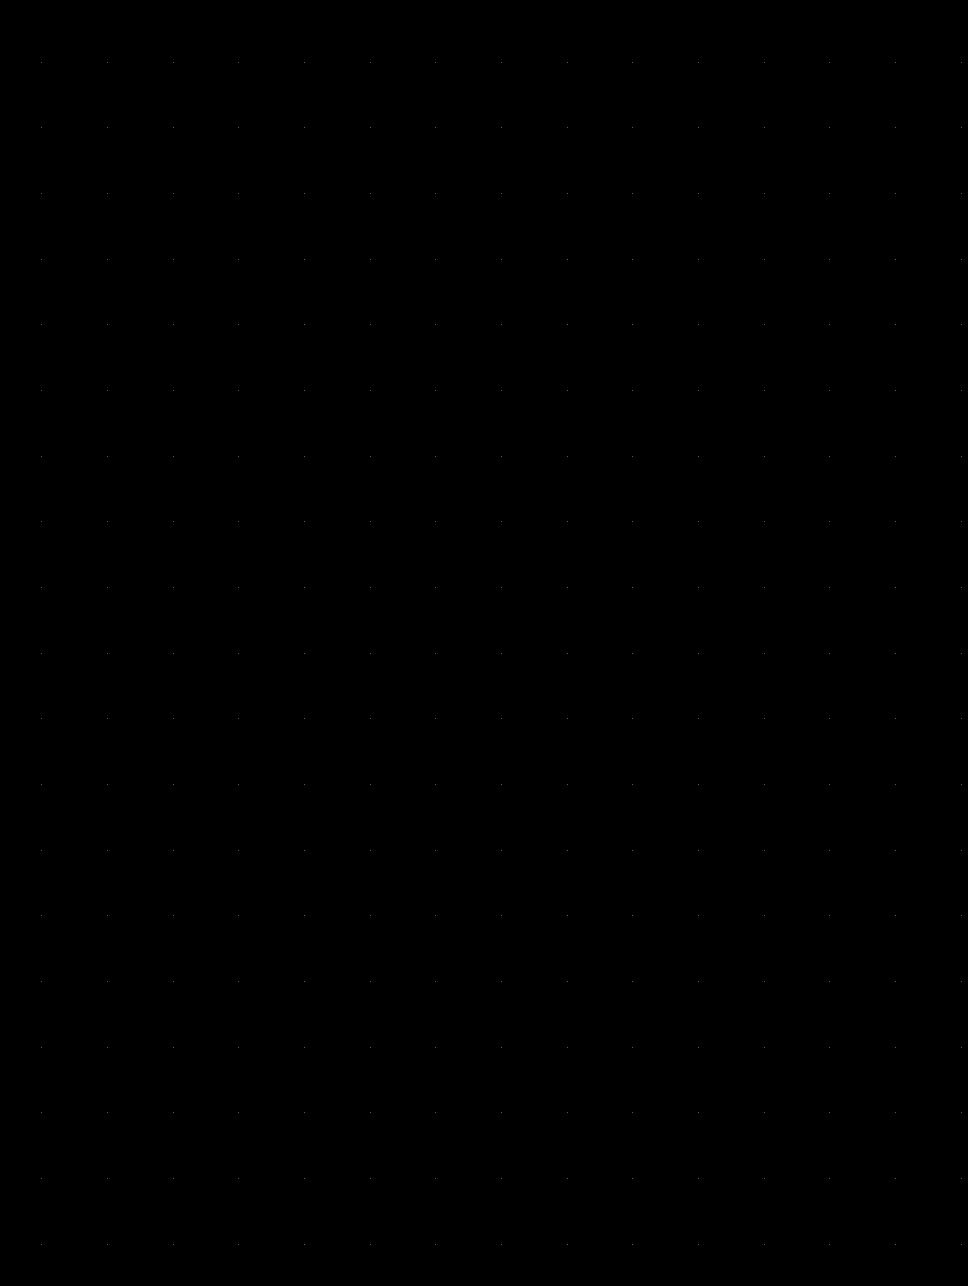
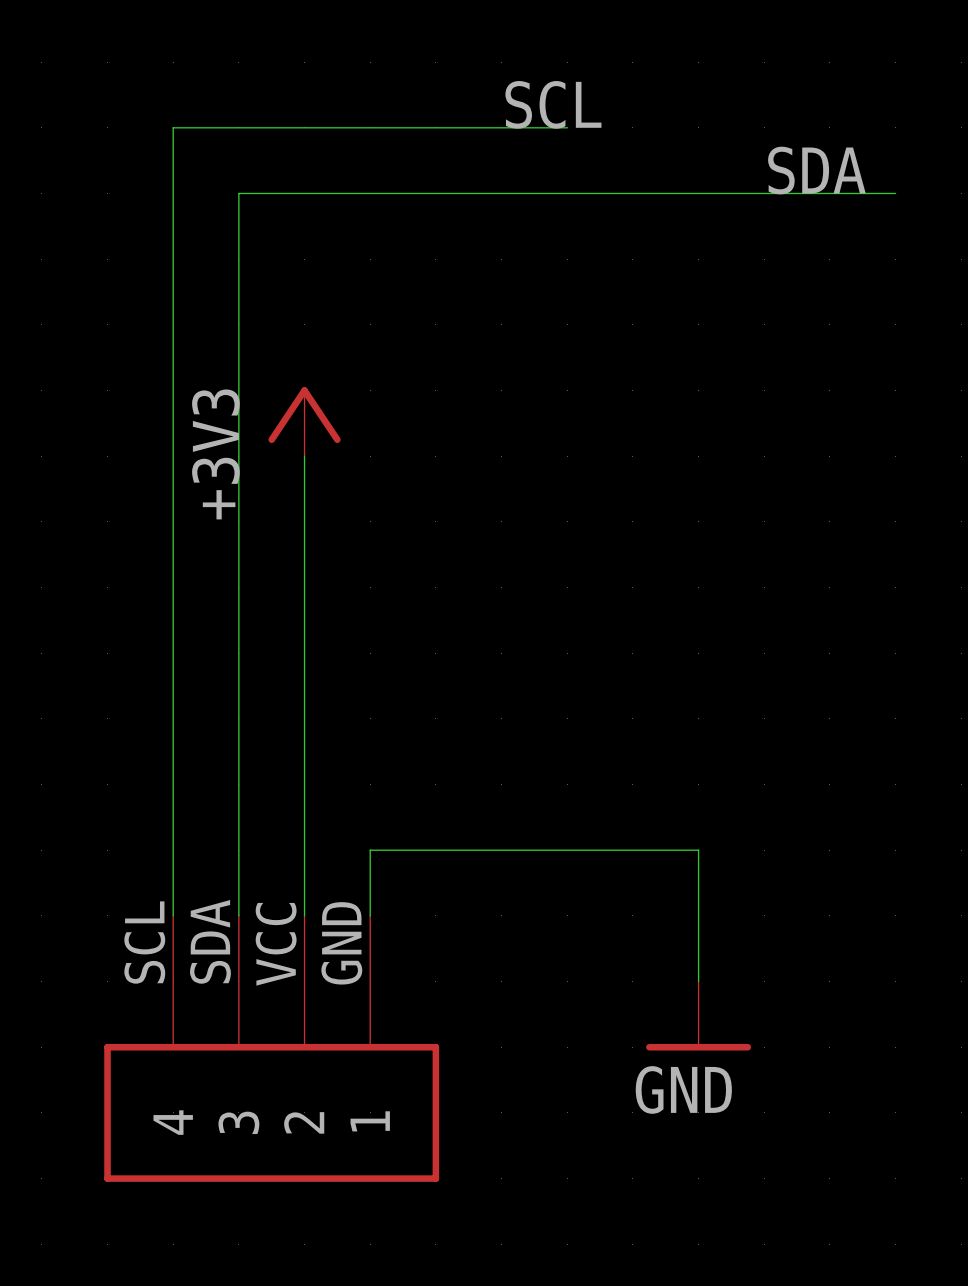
label: none -> SCL (553, 104)
wire: none -> (567, 127) (173, 127) (173, 915)
label: none -> SDA (816, 170)
wire: none -> (895, 193) (238, 193) (238, 915)
power symbol: none -> +3V3 (304, 421)
wire: none -> (304, 456) (304, 915)
wire: none -> (370, 915) (370, 850) (698, 850) (698, 981)
power symbol: none -> GND (698, 1016)
part: none -> (271, 1048)

